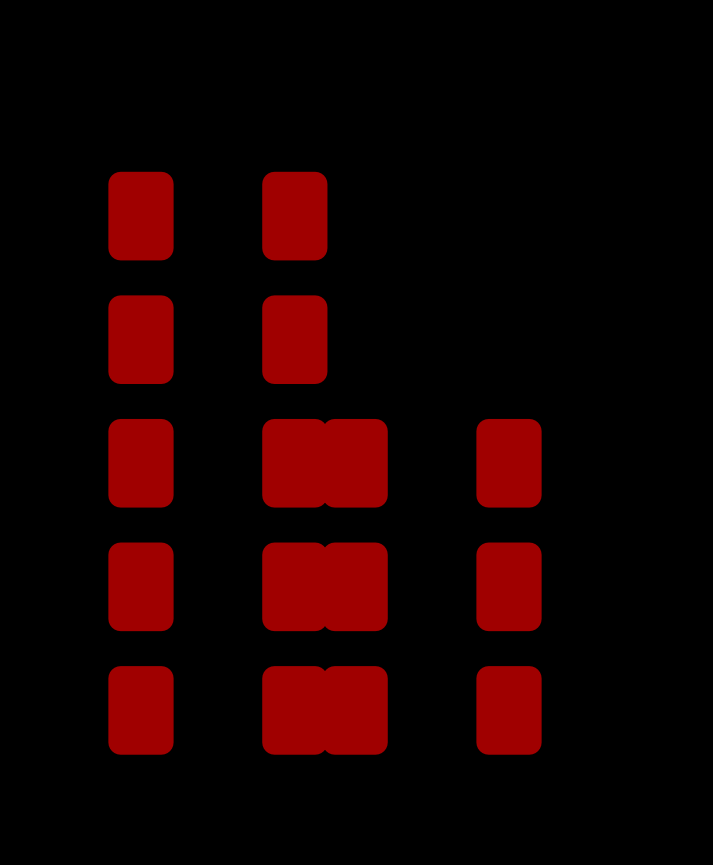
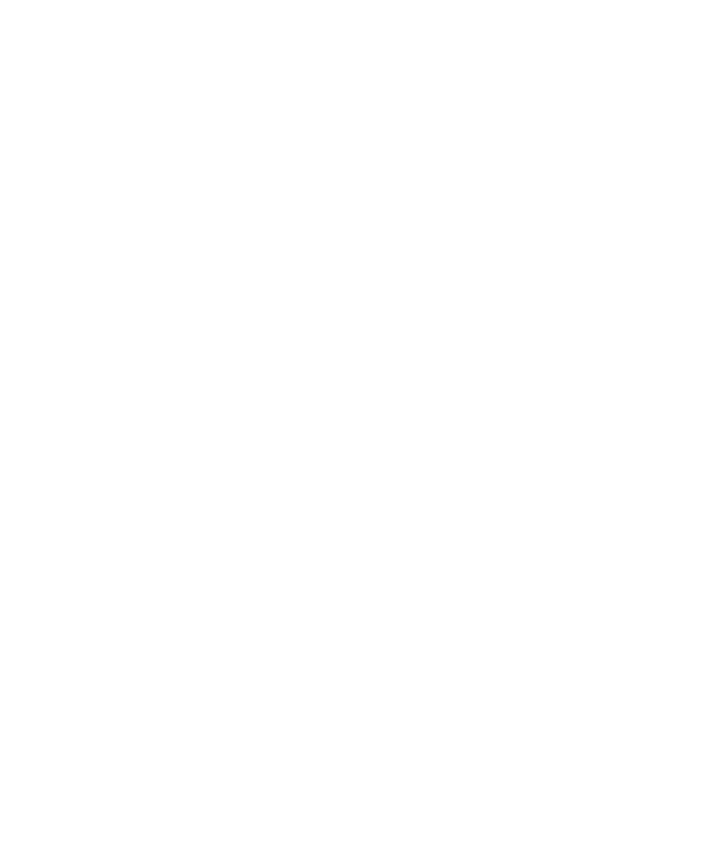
part: (217, 216) -> none
part: (217, 339) -> none
part: (217, 463) -> none
part: (432, 463) -> none
part: (217, 586) -> none
part: (432, 586) -> none
part: (217, 710) -> none
part: (432, 710) -> none

